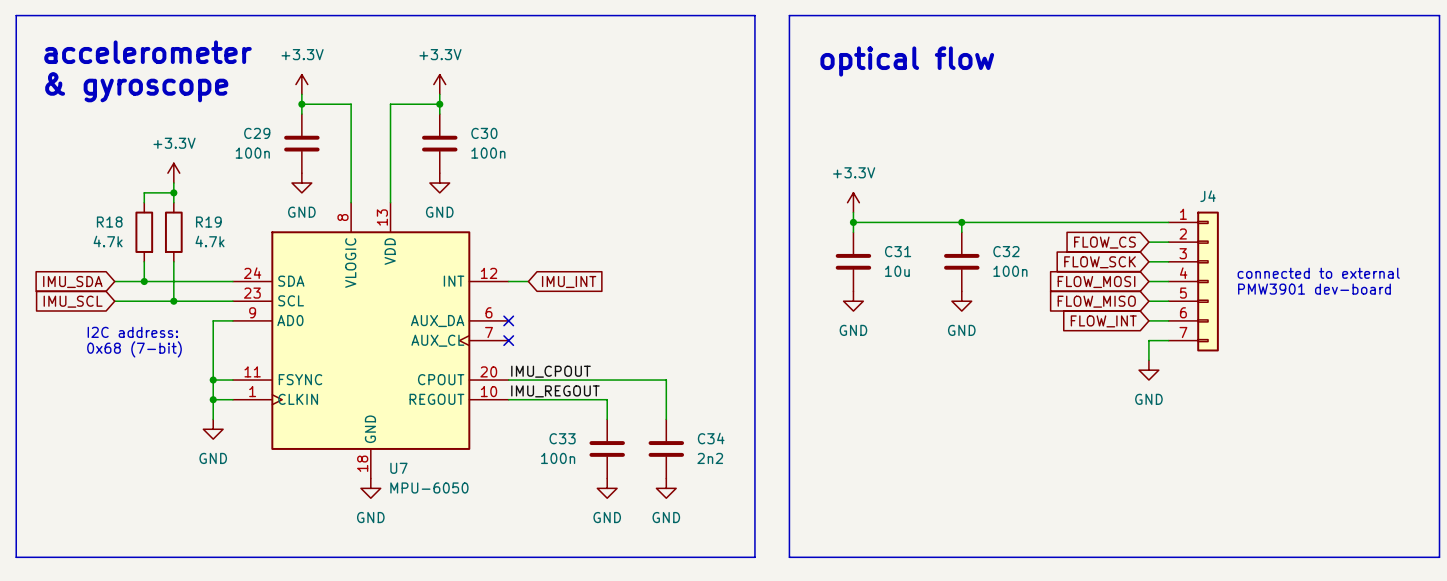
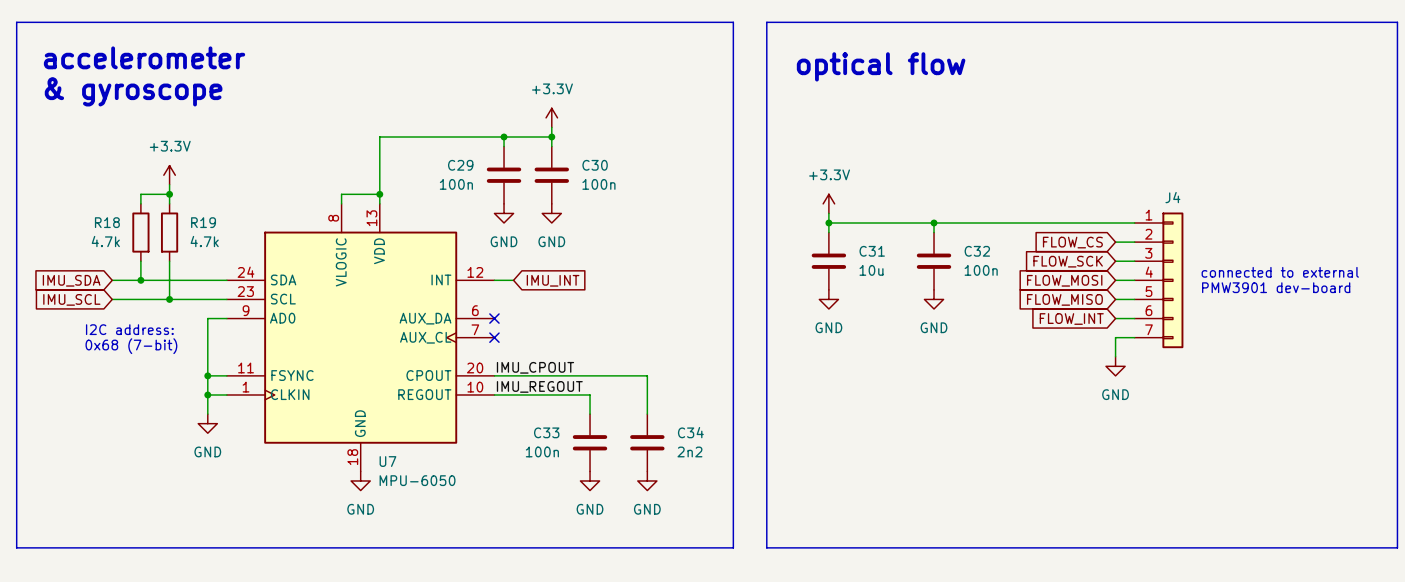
power symbol: +3.3V (301, 84) -> none
power symbol position: +3.3V (439, 84) -> +3.3V (551, 117)
wire: (301, 94) (301, 114) -> none
wire: (439, 94) (439, 114) -> (551, 127) (551, 146)
wire: (301, 104) (351, 104) (351, 192) -> (379, 194) (341, 194)
junction: (301, 104) -> none
wire: (439, 104) (390, 104) (390, 133) -> (551, 137) (379, 137)
junction: (439, 104) -> none
wire: none -> (504, 137) (504, 146)
junction: none -> (504, 137)
junction: none -> (551, 137)
C29 position: (301, 143) -> (504, 175)
C30 position: (439, 143) -> (551, 175)
power symbol: GND (301, 183) -> none
power symbol: GND (439, 183) -> none
junction: none -> (379, 194)
power symbol: none -> GND (504, 213)
power symbol: none -> GND (551, 213)

